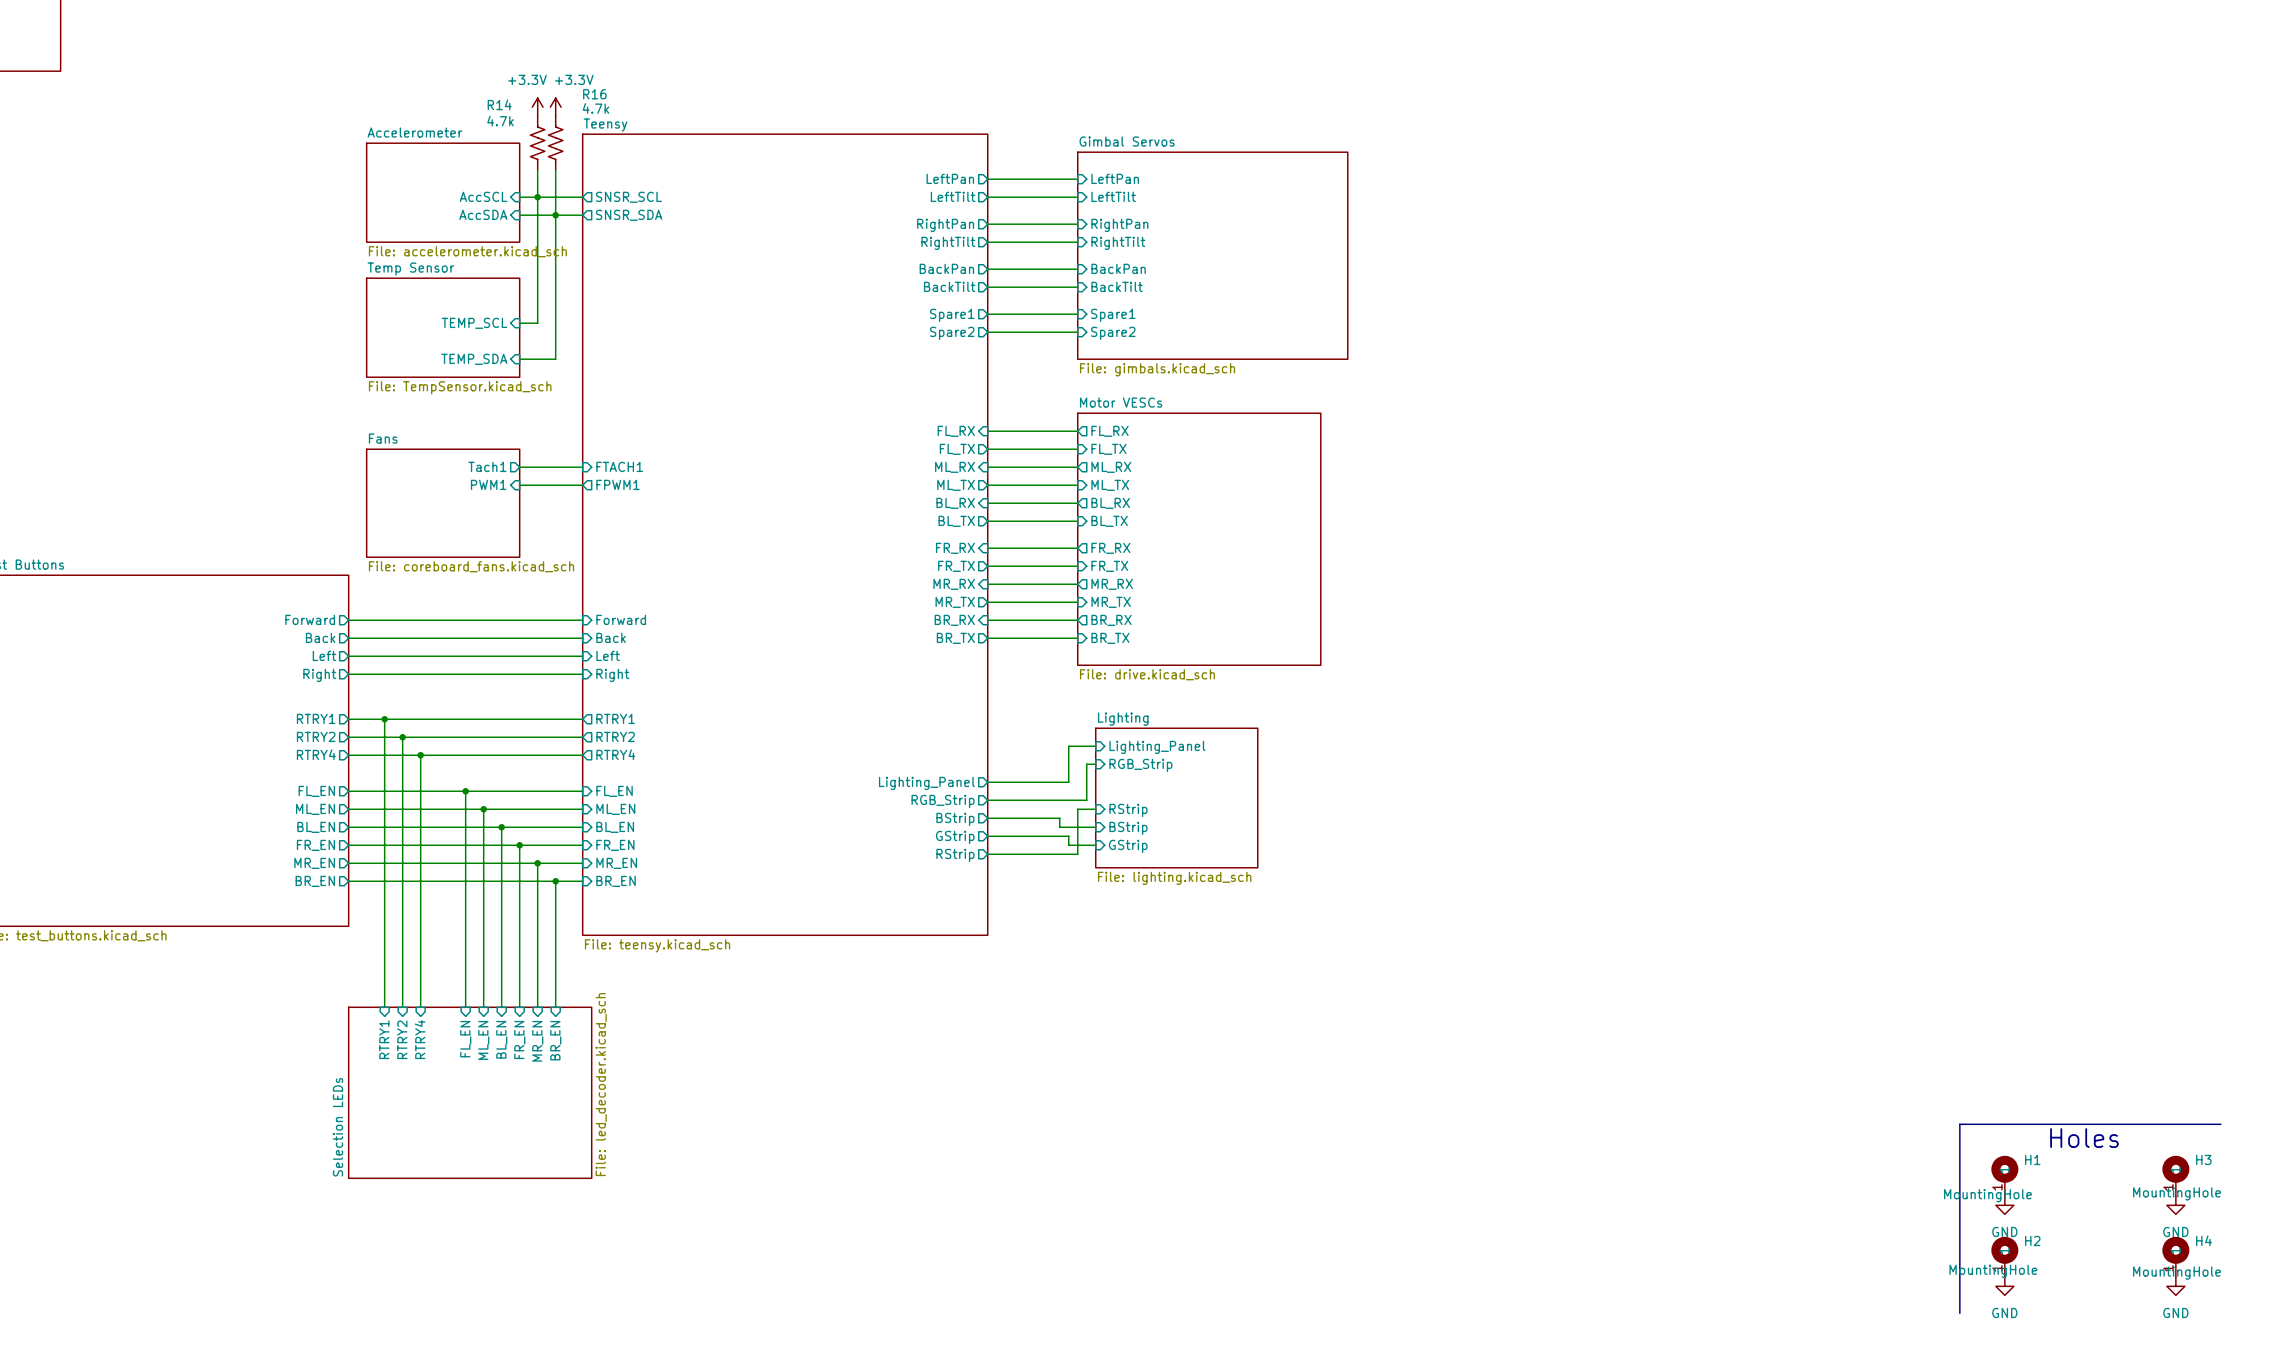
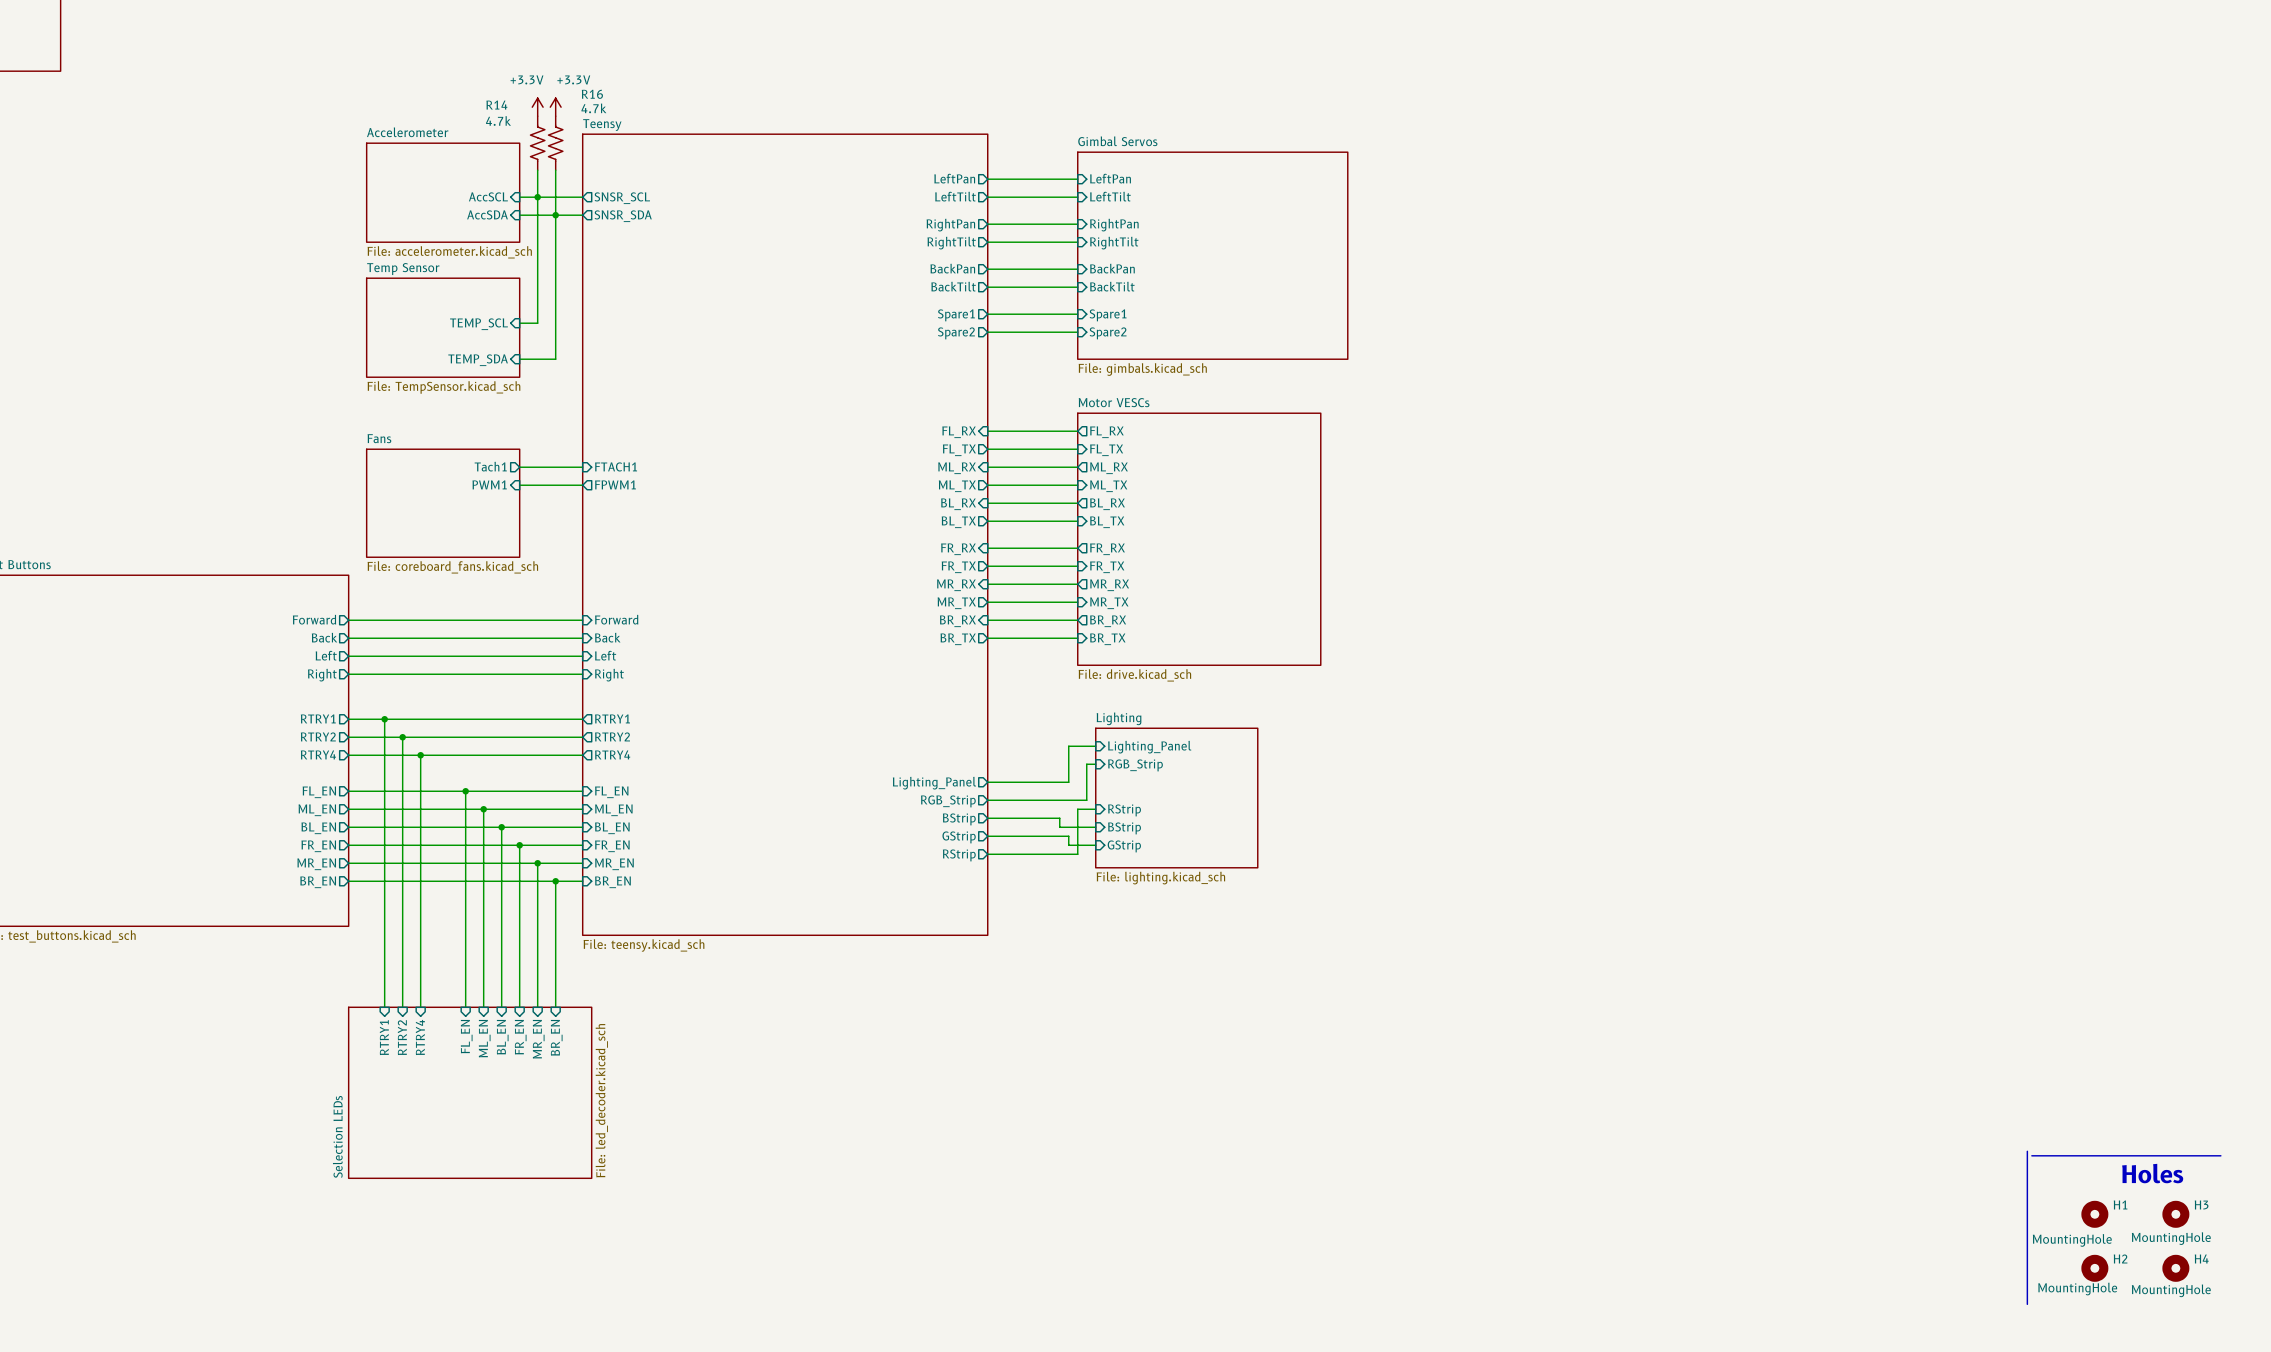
line: (2220, 1124) (1959, 1124) (1959, 1313) -> none
text position: Holes (2084, 1138) -> Holes (2152, 1173)
line: none -> (2027, 1151) (2027, 1304)
H1 symbol: [1991, 1155, 2019, 1197] -> [2081, 1200, 2109, 1228]
line: none -> (2031, 1155) (2220, 1155)
H3 symbol: [2162, 1155, 2190, 1197] -> [2162, 1200, 2190, 1228]
power symbol: GND (2004, 1205) -> none
power symbol: GND (2175, 1205) -> none
H2 symbol: [1991, 1236, 2019, 1278] -> [2081, 1254, 2109, 1282]
H4 symbol: [2162, 1236, 2190, 1278] -> [2162, 1254, 2190, 1282]
power symbol: GND (2004, 1286) -> none
power symbol: GND (2175, 1286) -> none

